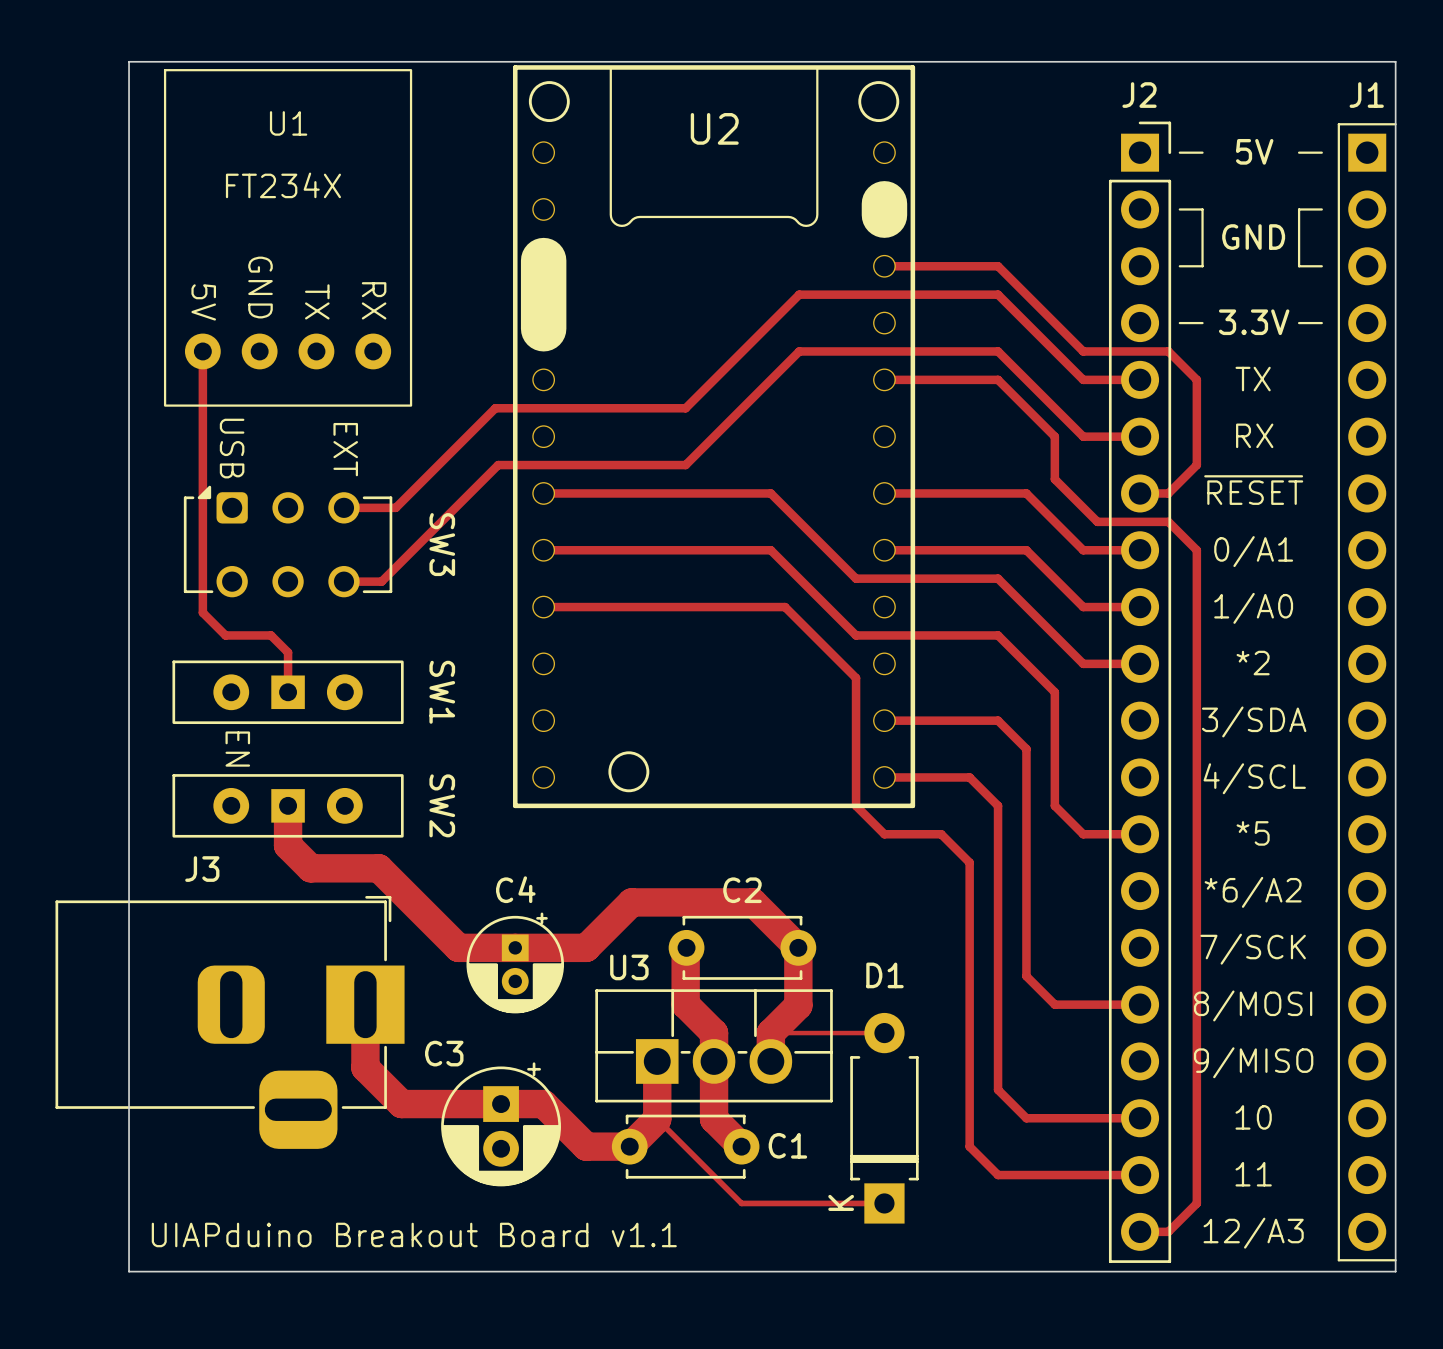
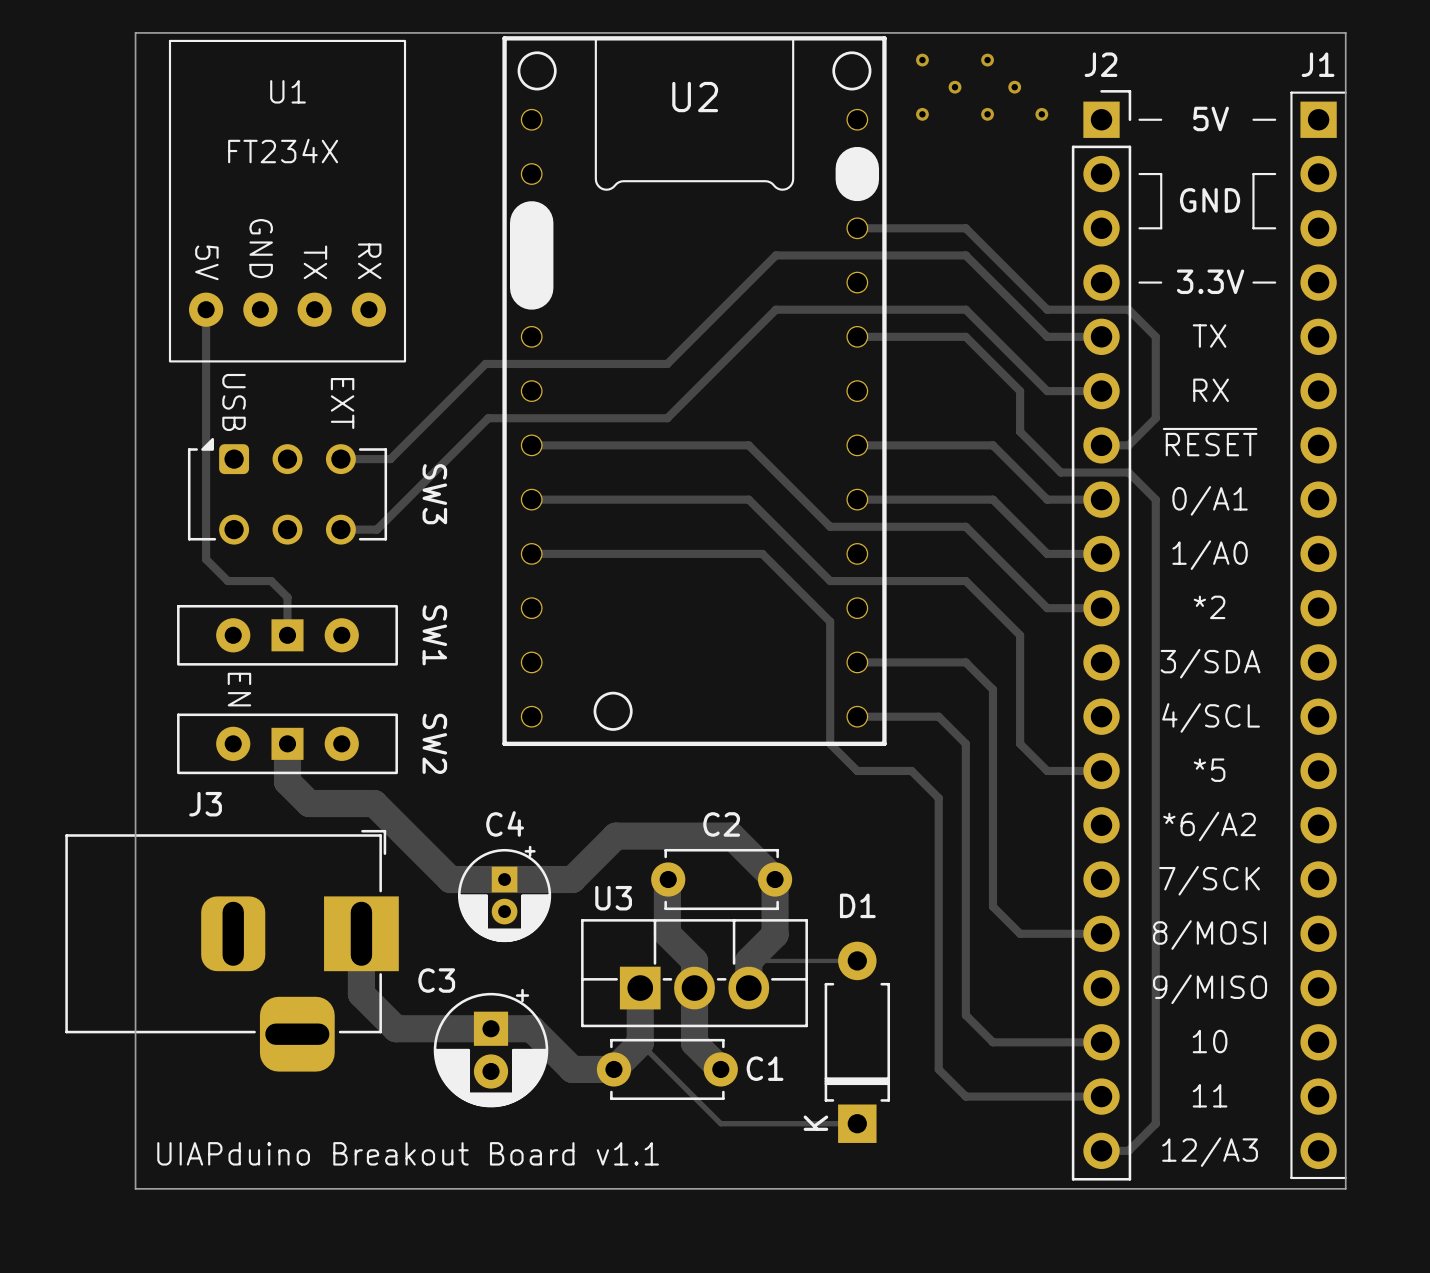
via: none -> (922, 60)
via: none -> (987, 60)
via: none -> (955, 87)
via: none -> (1014, 87)
via: none -> (922, 114)
via: none -> (987, 114)
via: none -> (1041, 114)

